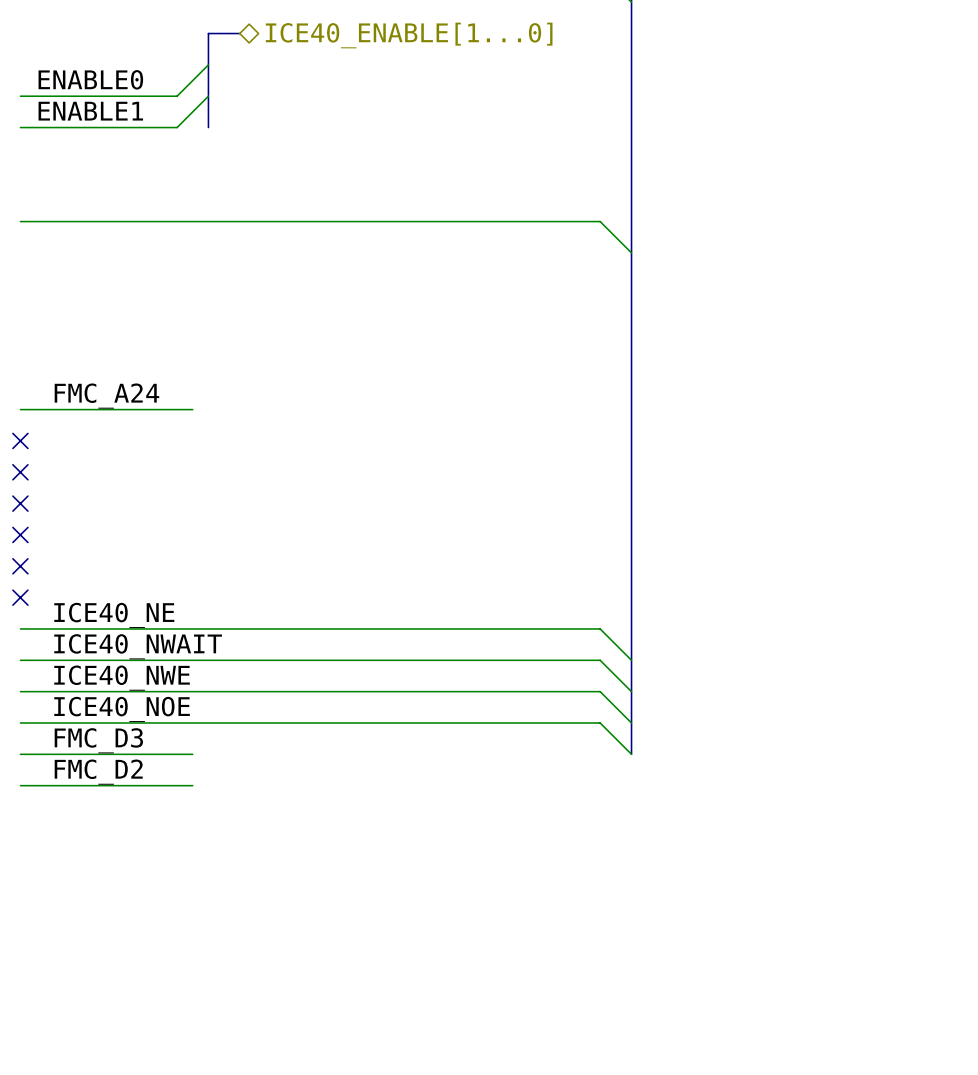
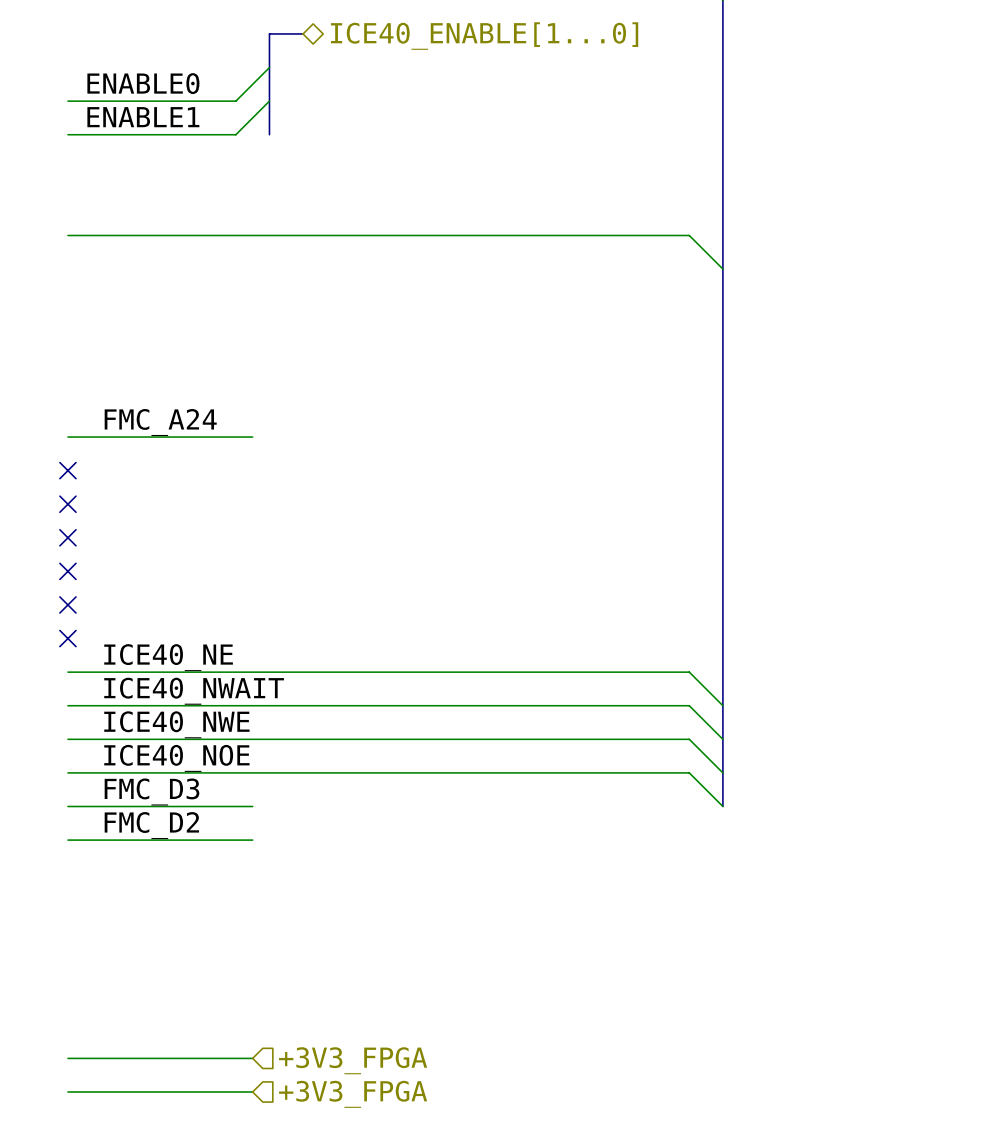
wire: none -> (67, 1058) (252, 1058)
hierarchical label: none -> +3V3_FPGA (353, 1060)
wire: none -> (67, 1092) (252, 1092)
hierarchical label: none -> +3V3_FPGA (353, 1094)

